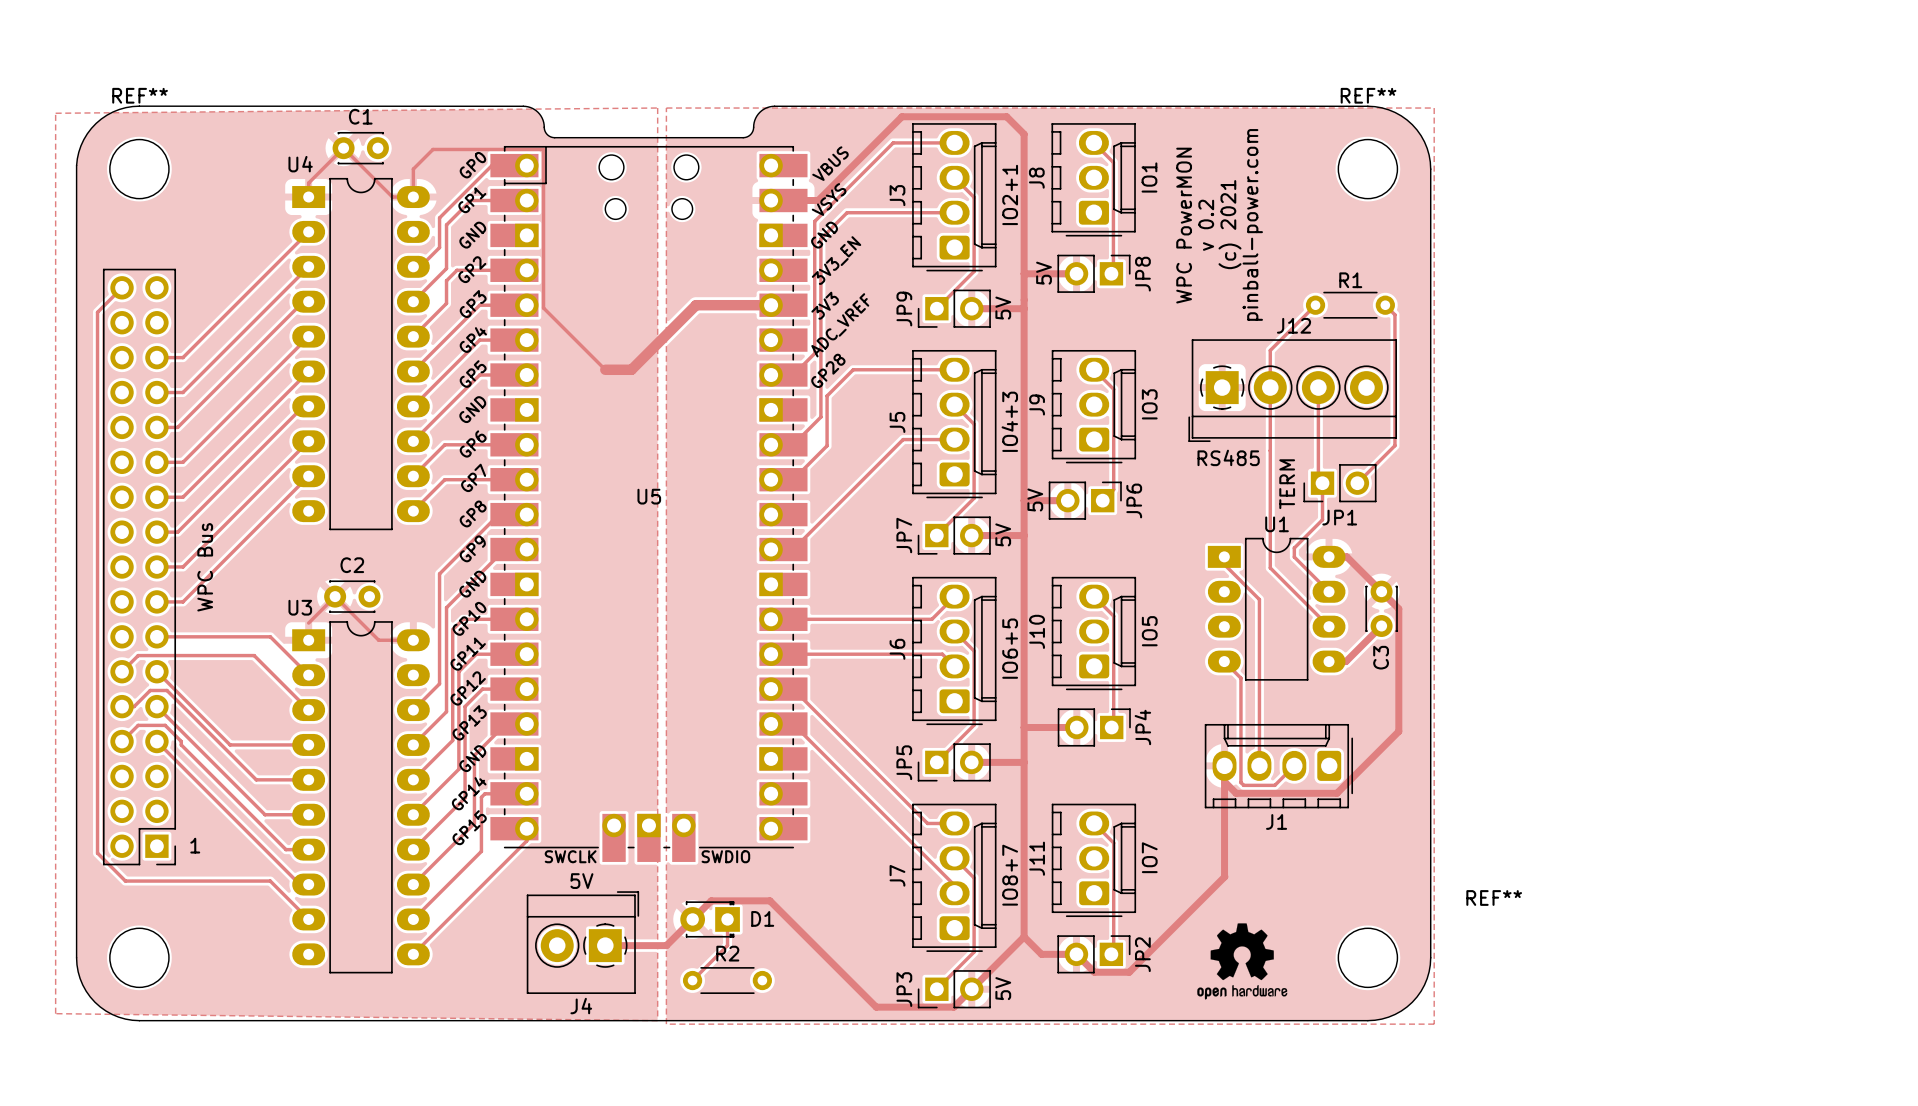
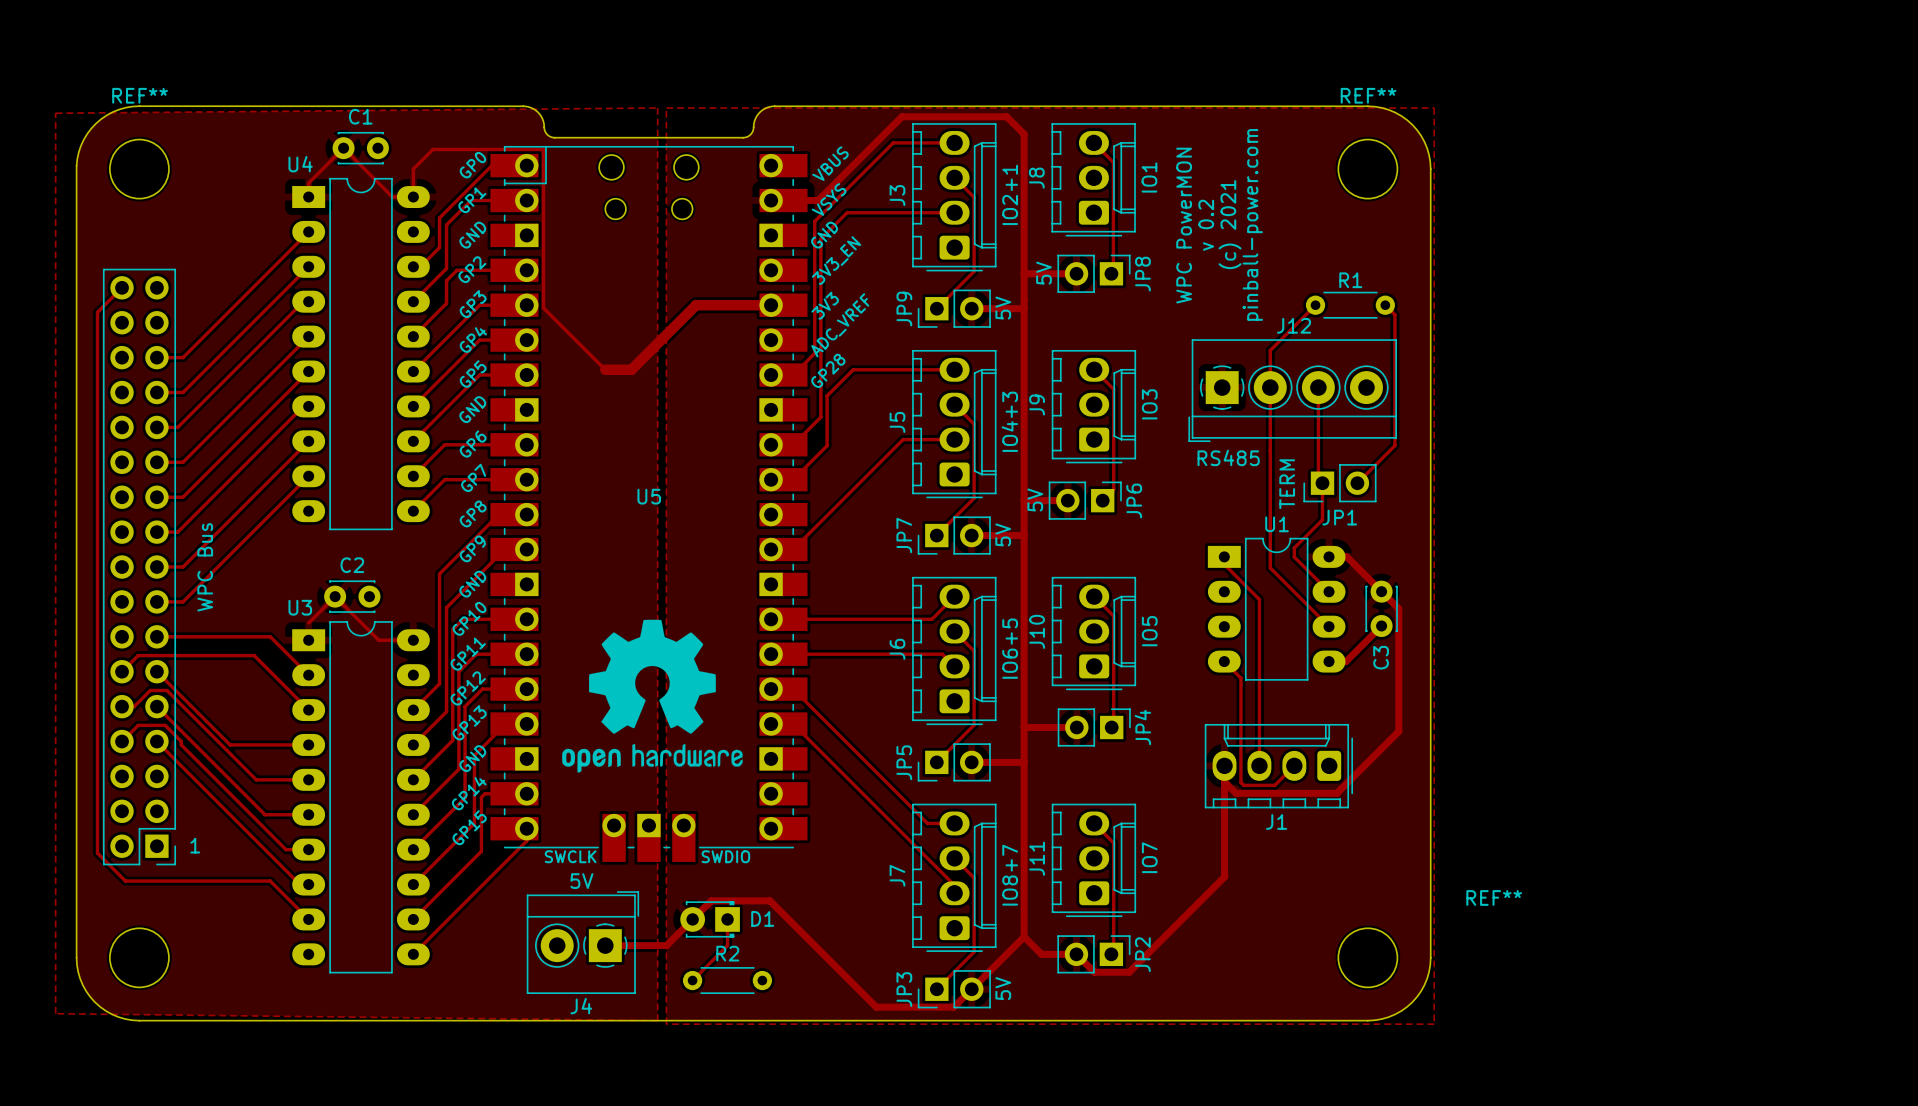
drawing: none -> [562, 619, 743, 773]
drawing: [1197, 923, 1288, 1000] -> none

